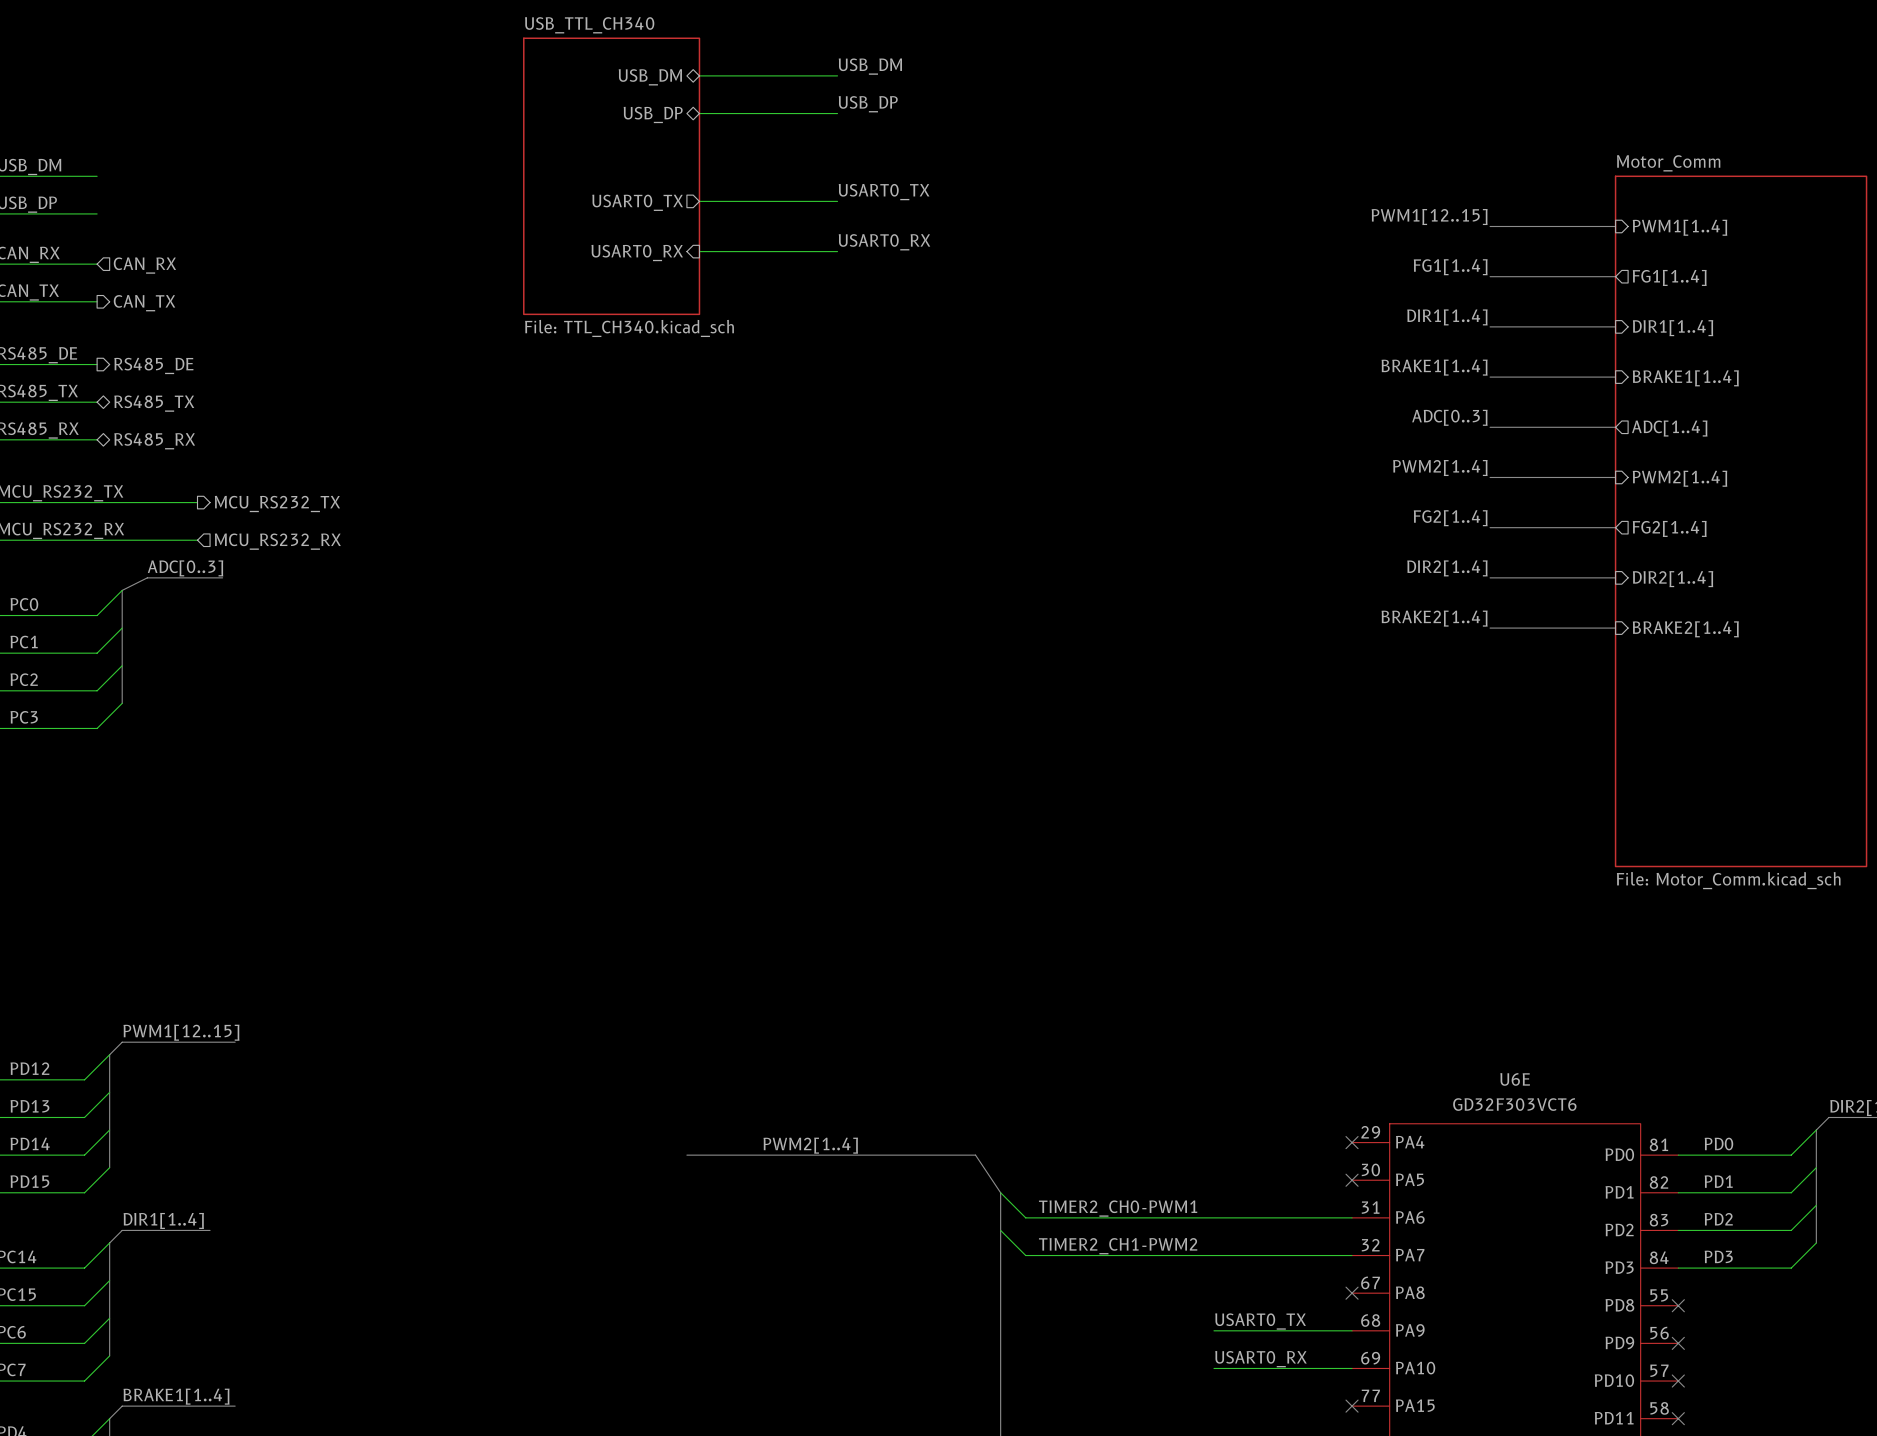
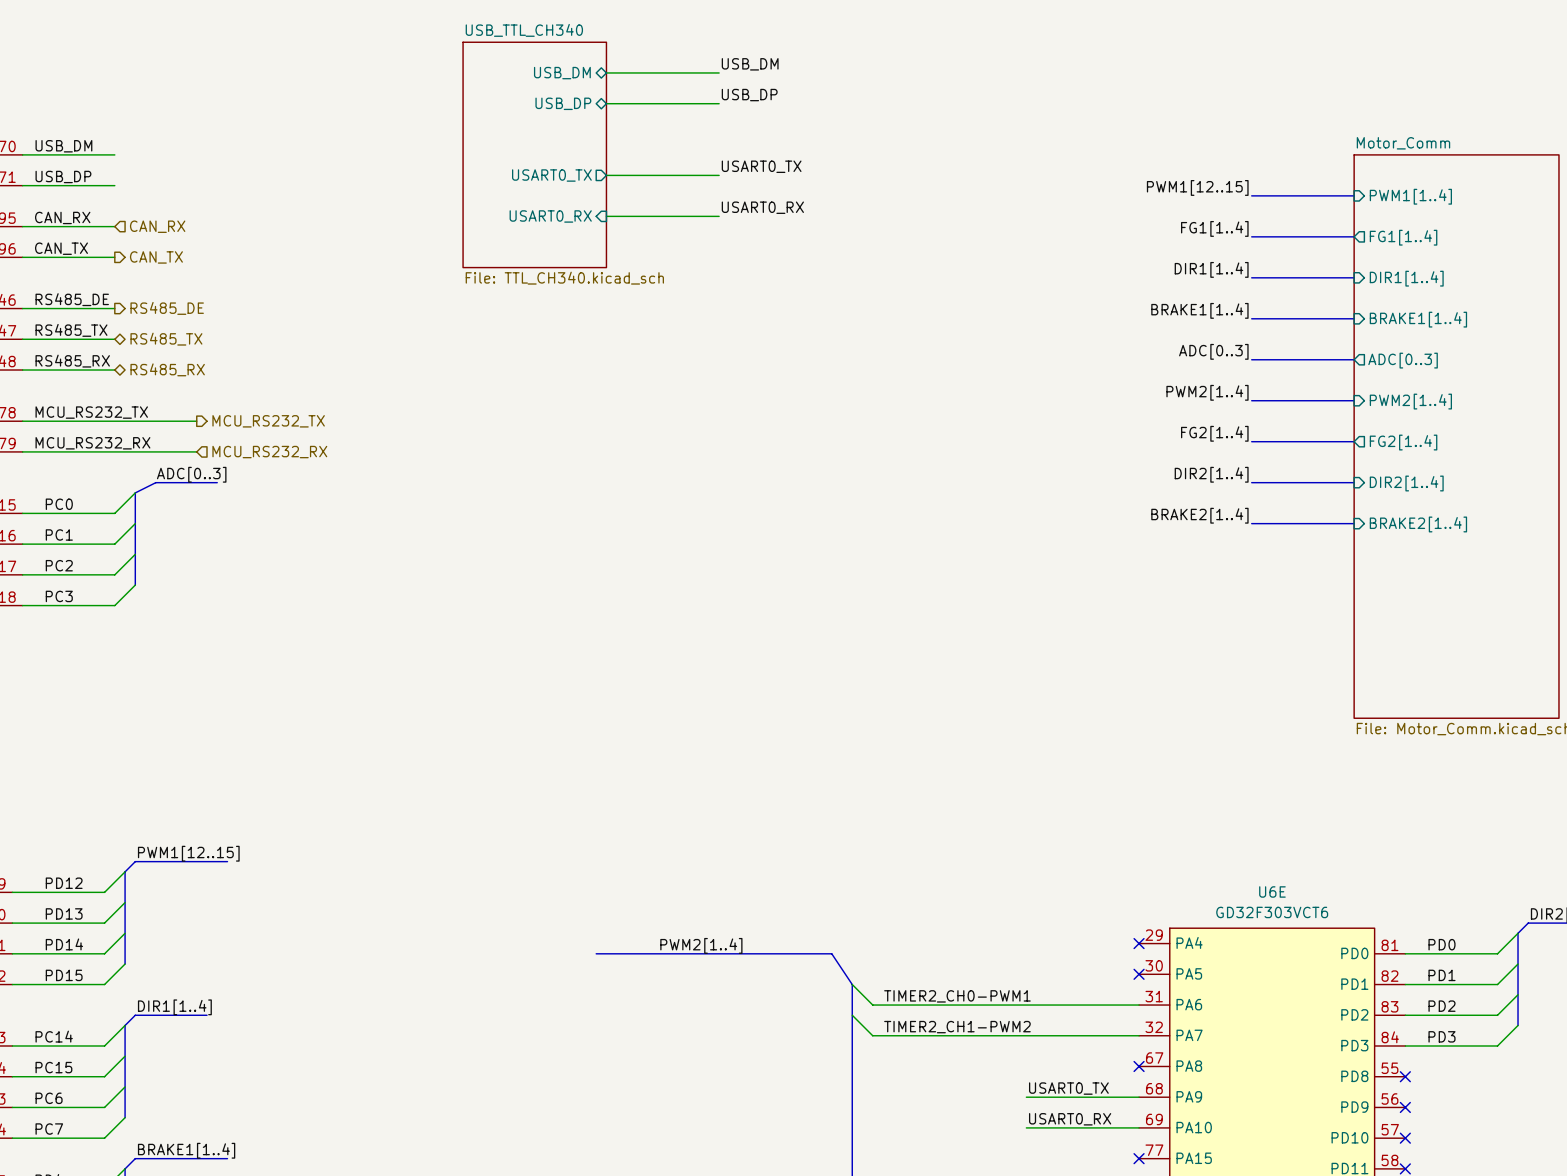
sheet pin: ADC[1..4] (1669, 428) -> ADC[0..3] (1403, 360)

